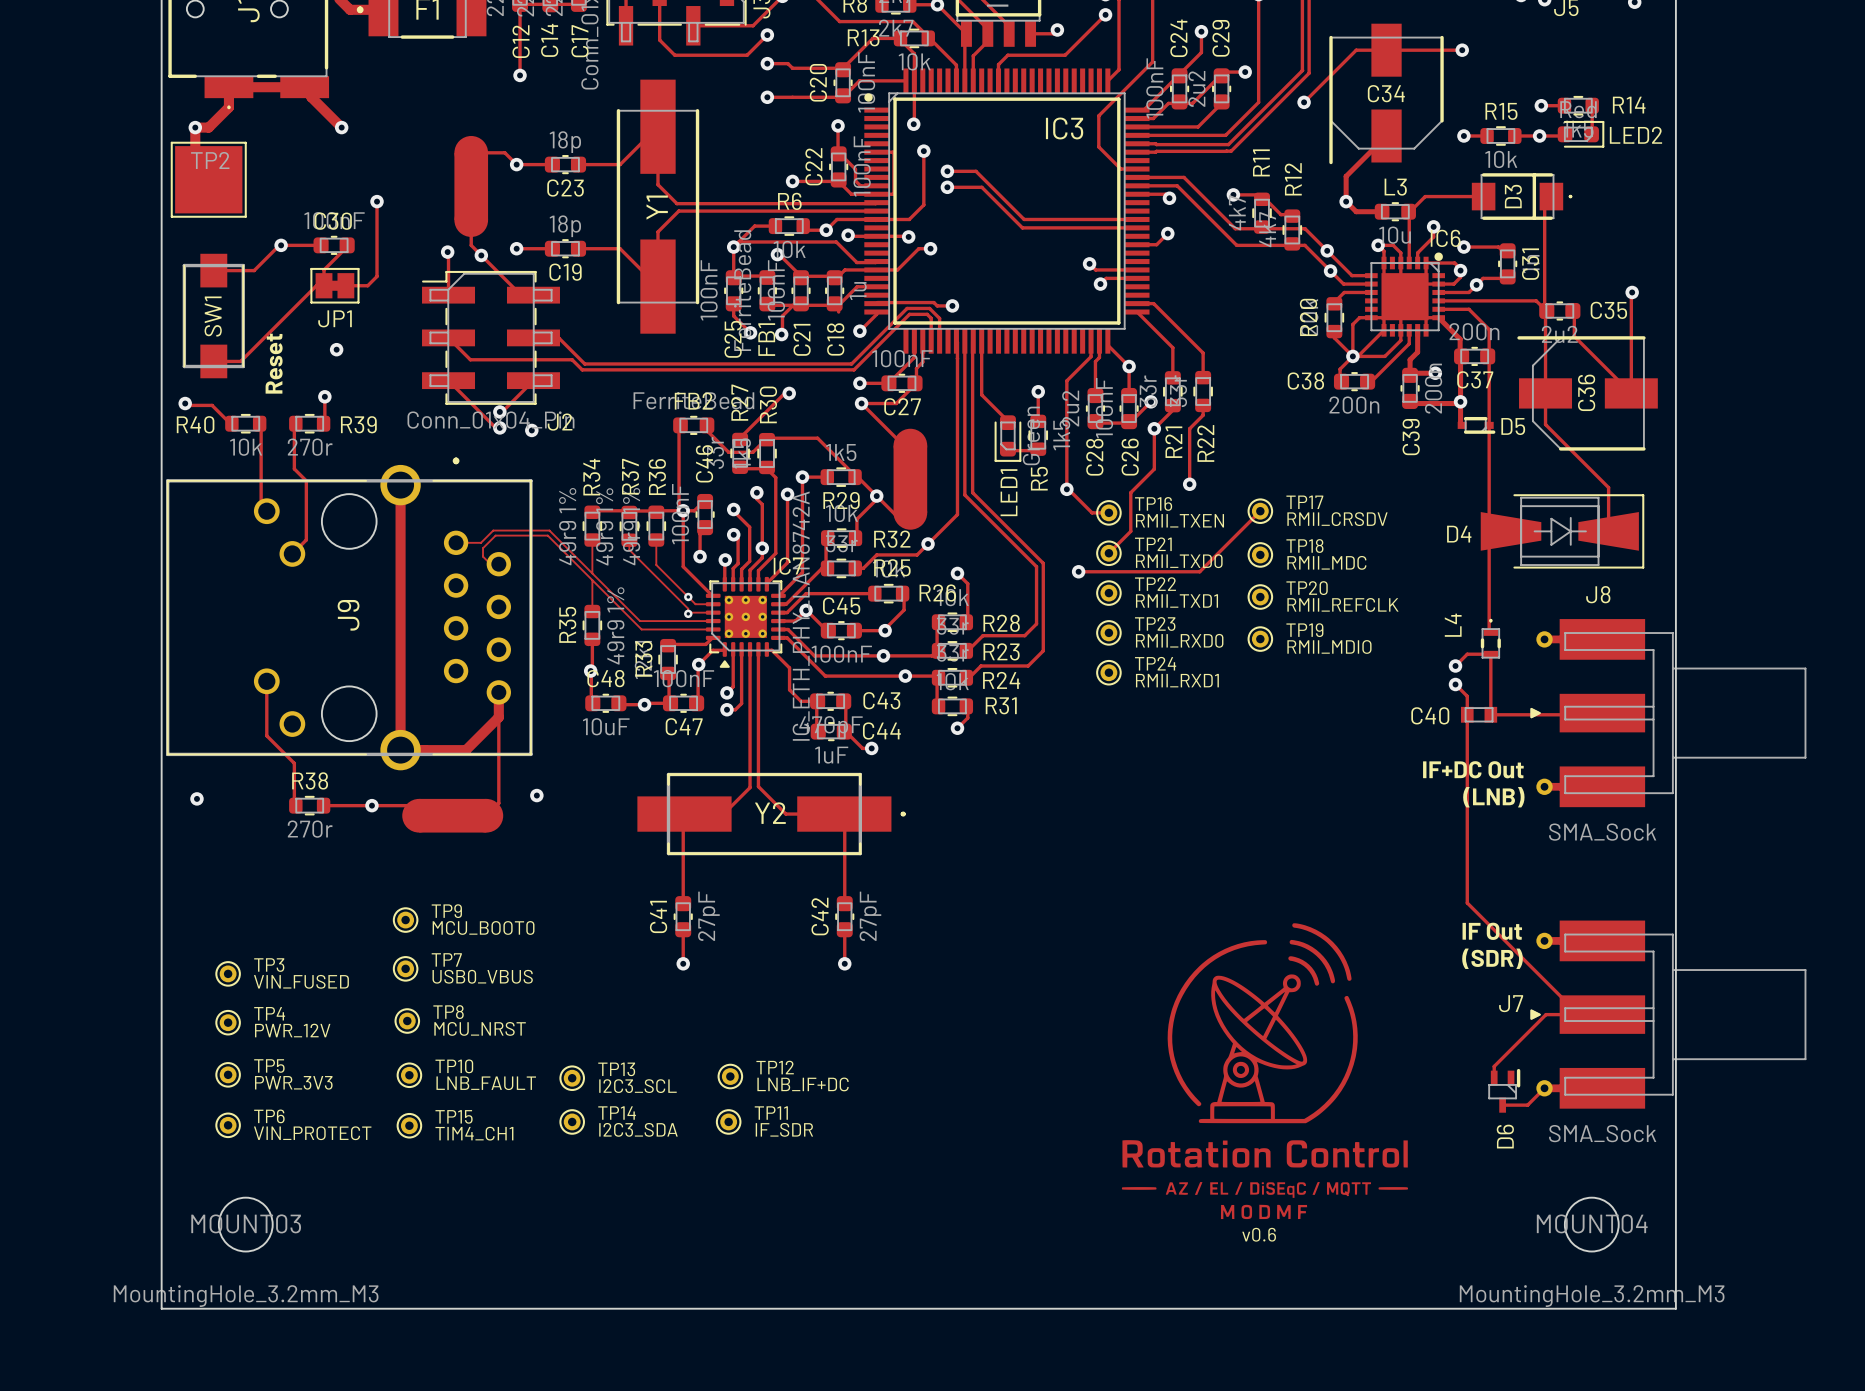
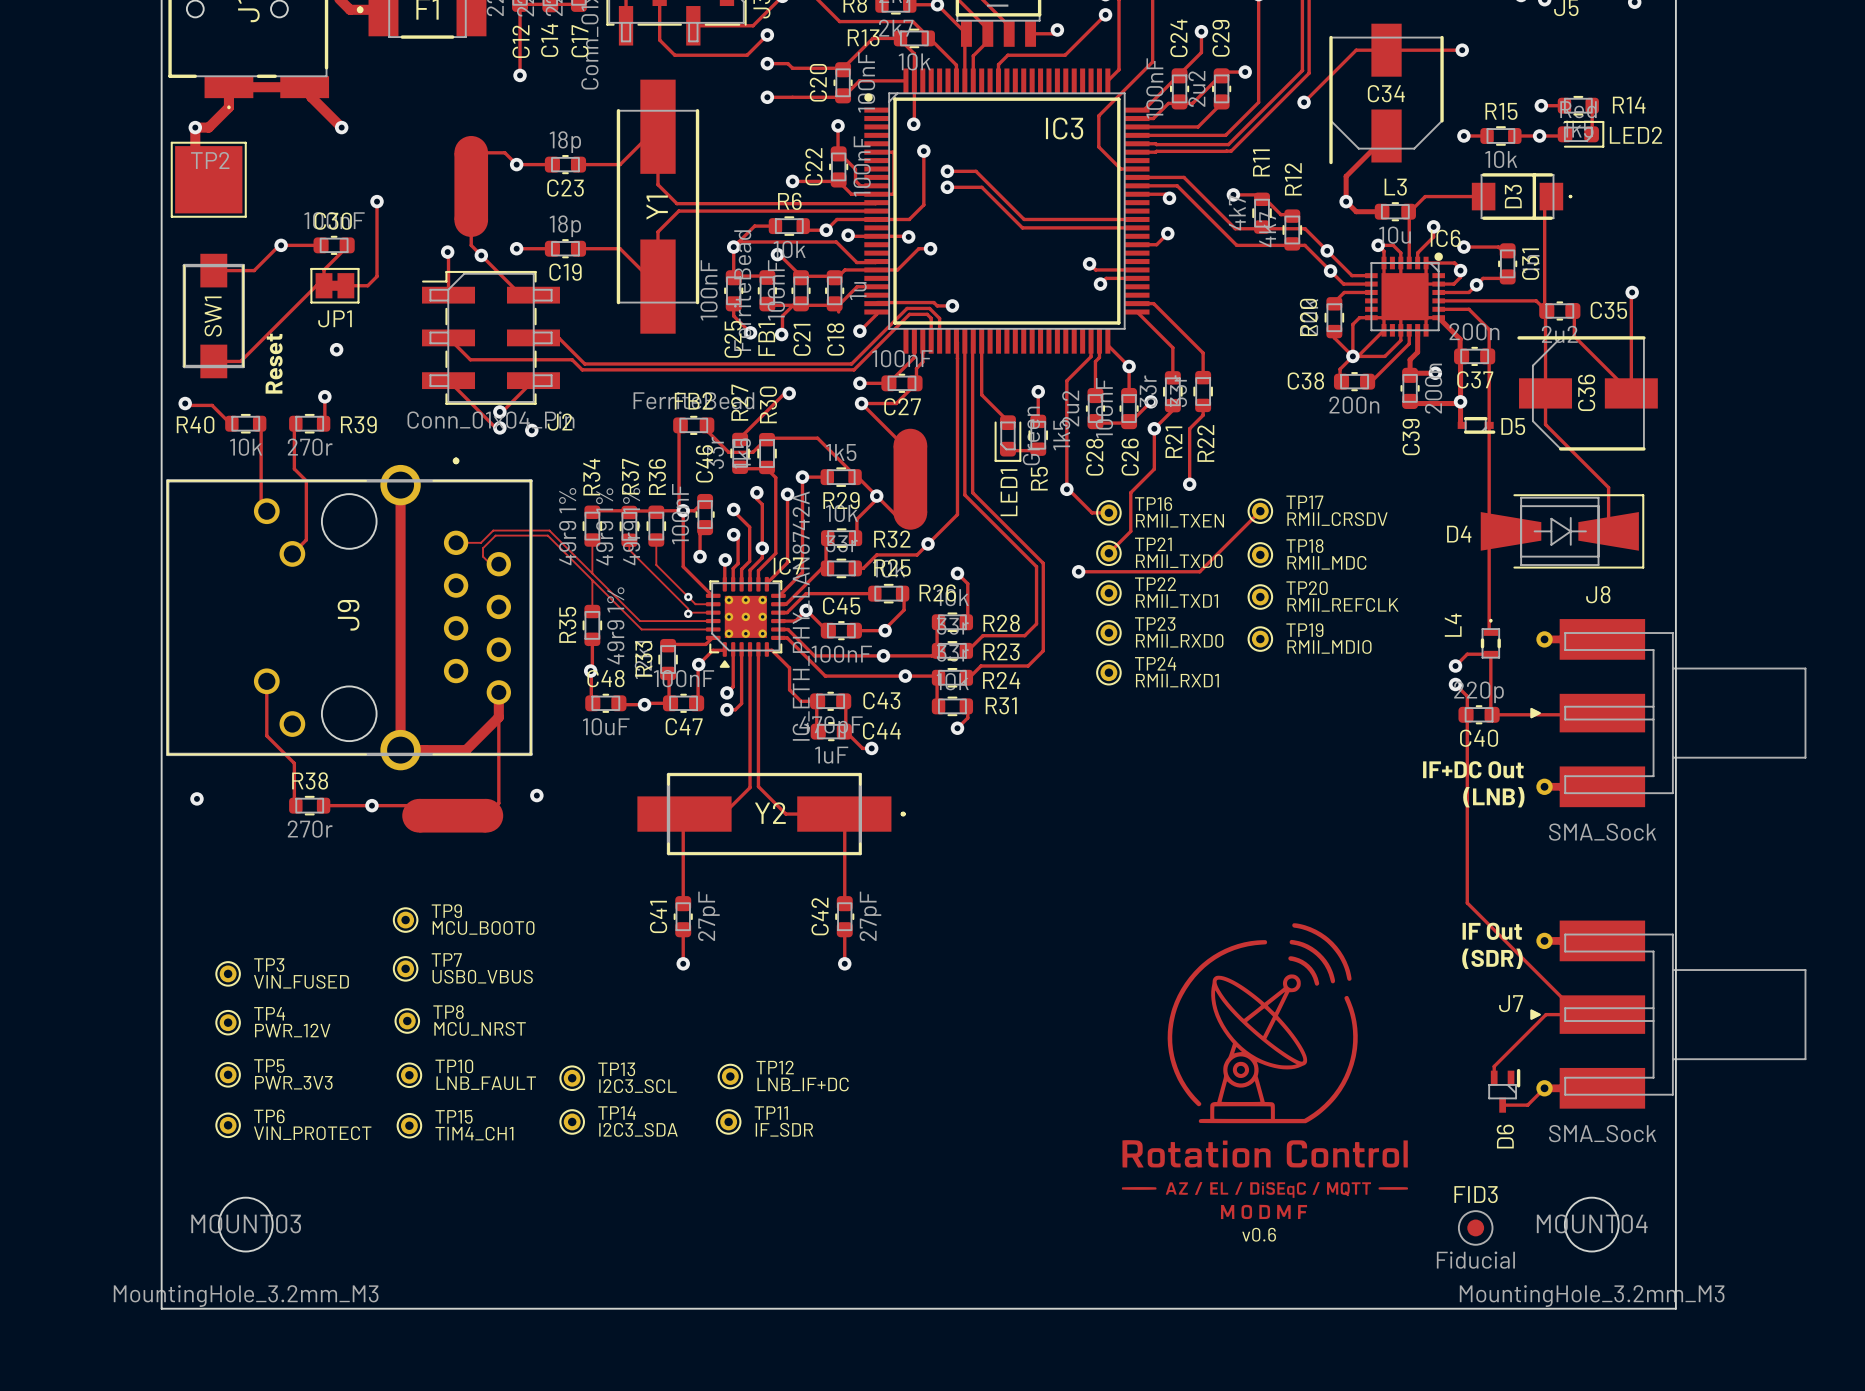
C40 value: none -> 220p (1478, 692)
C40 footprint: [1460, 706, 1498, 723] -> [1458, 705, 1500, 725]
C40 name position: C40 (1430, 715) -> C40 (1479, 738)
FID3: none -> Fiducial (1475, 1227)

